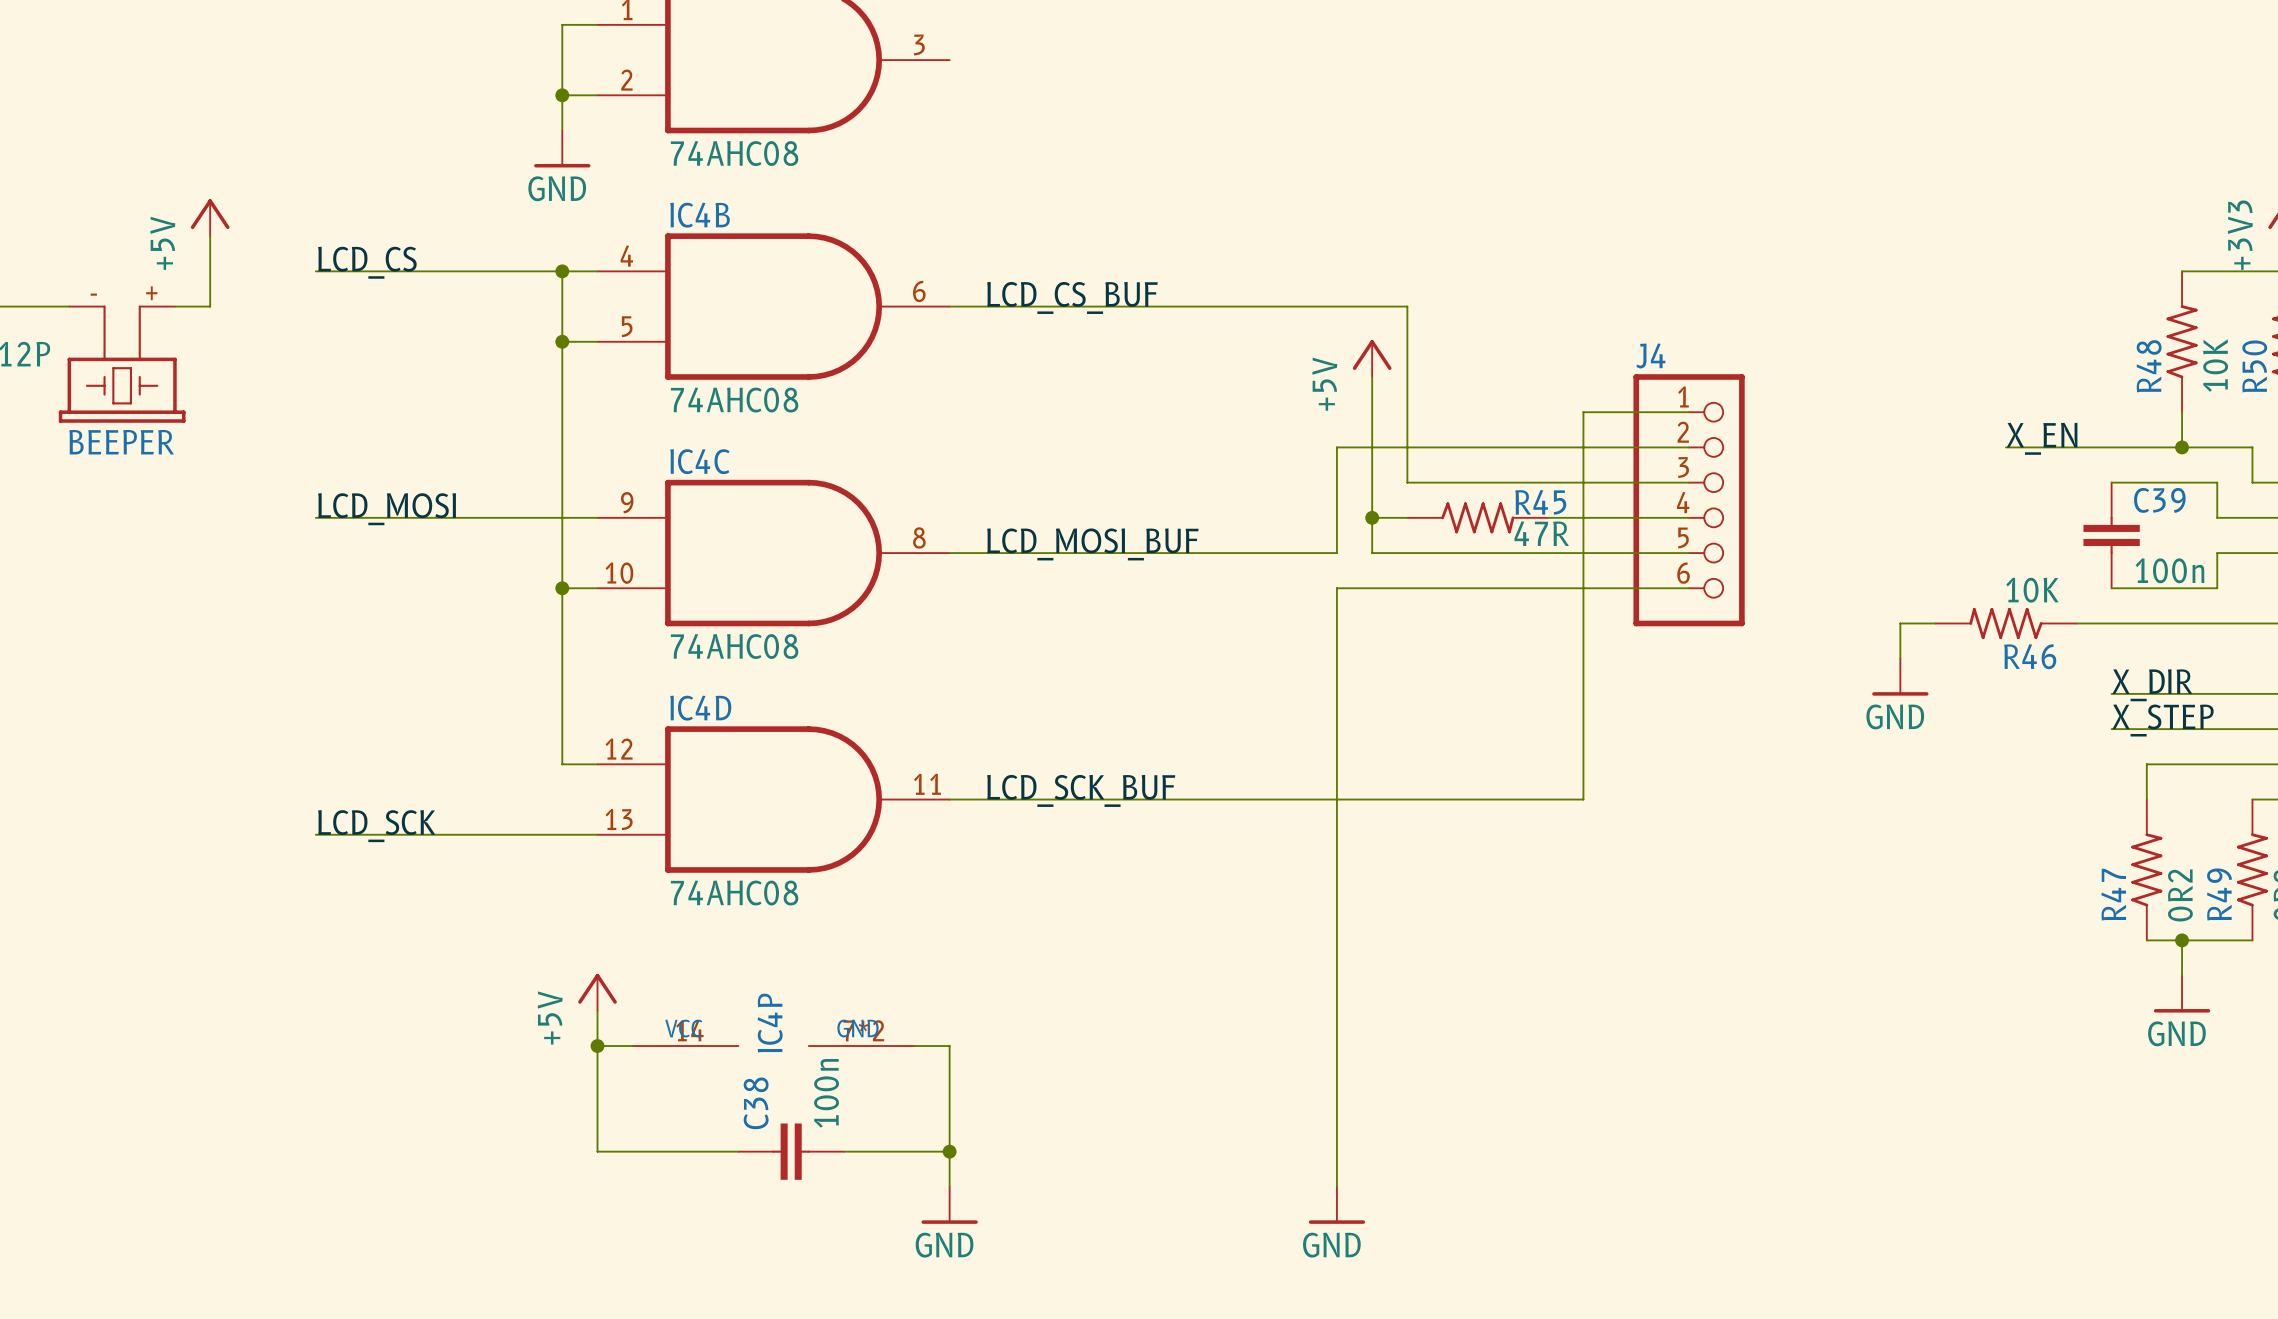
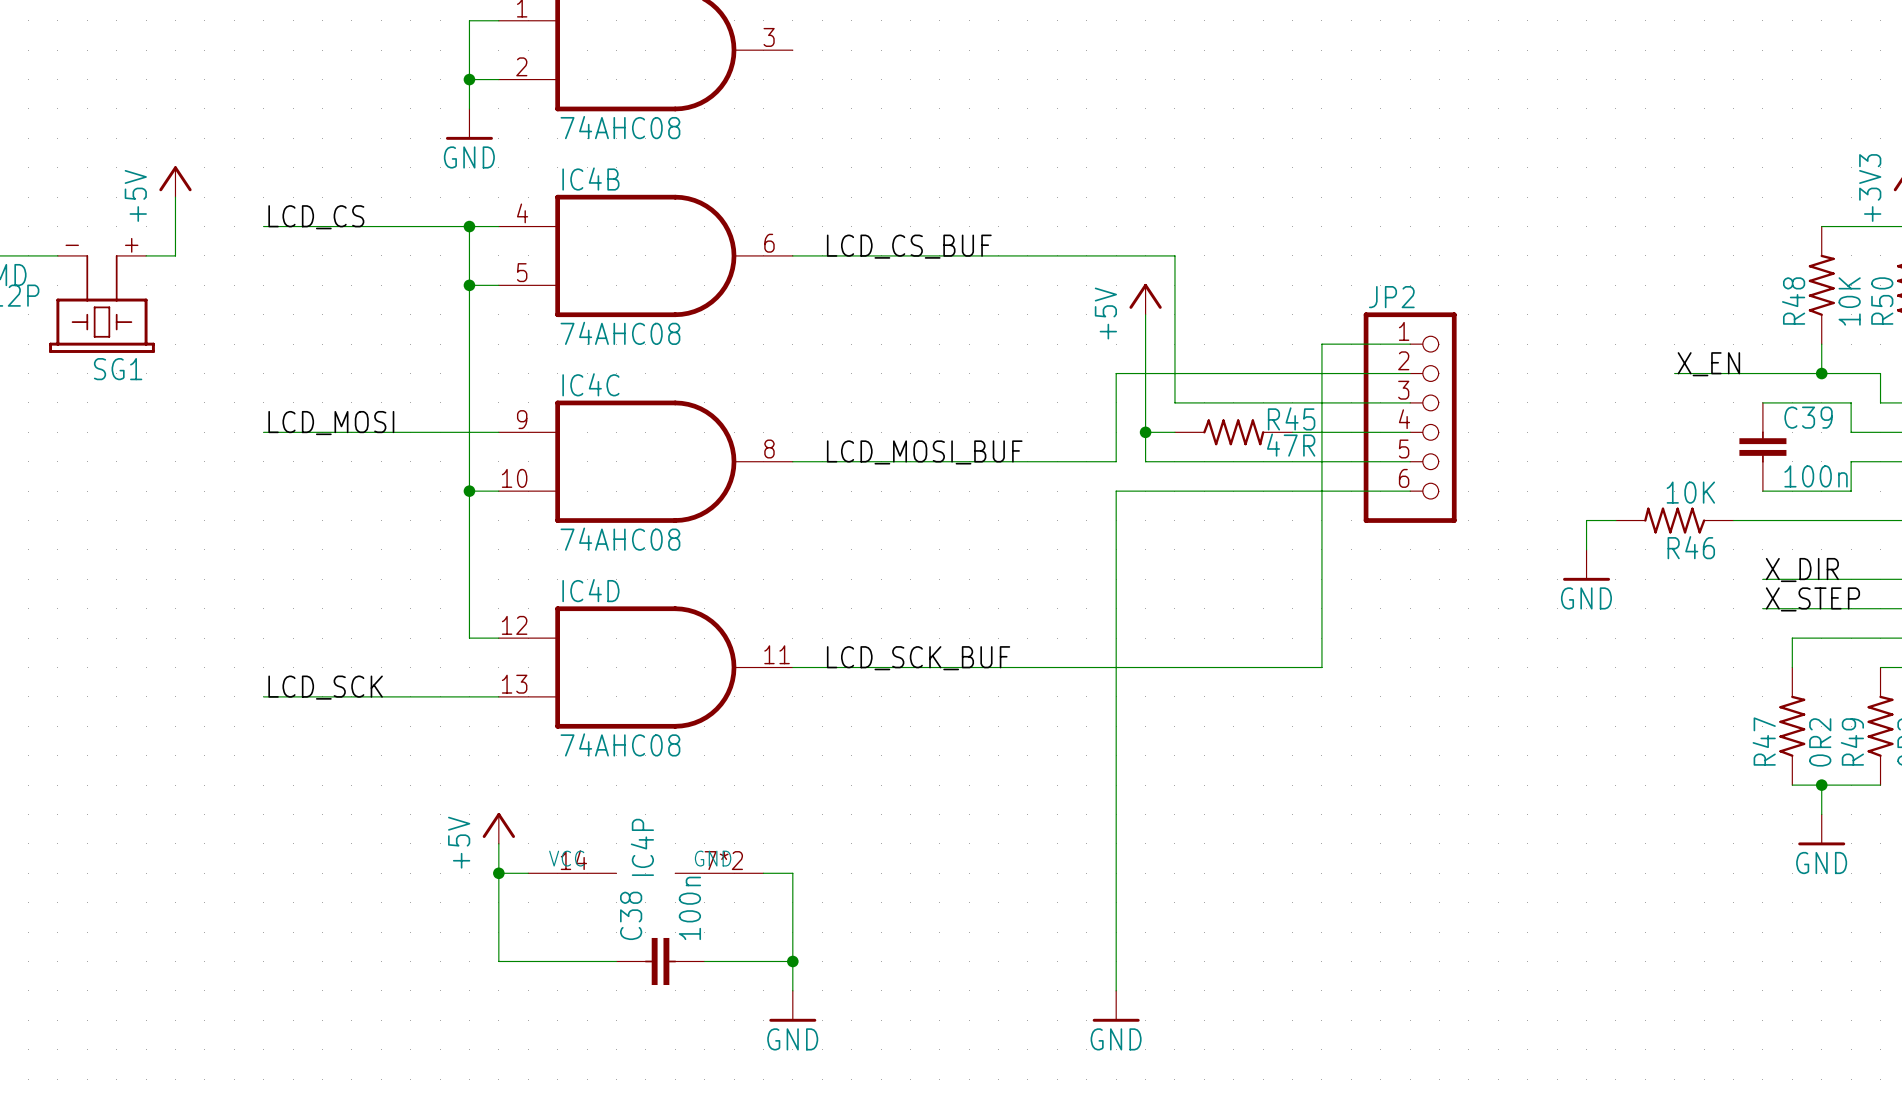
J4 name: J4 (1650, 356) -> JP2 (1391, 297)
BEEPER name: BEEPER (121, 442) -> SG1 (118, 369)

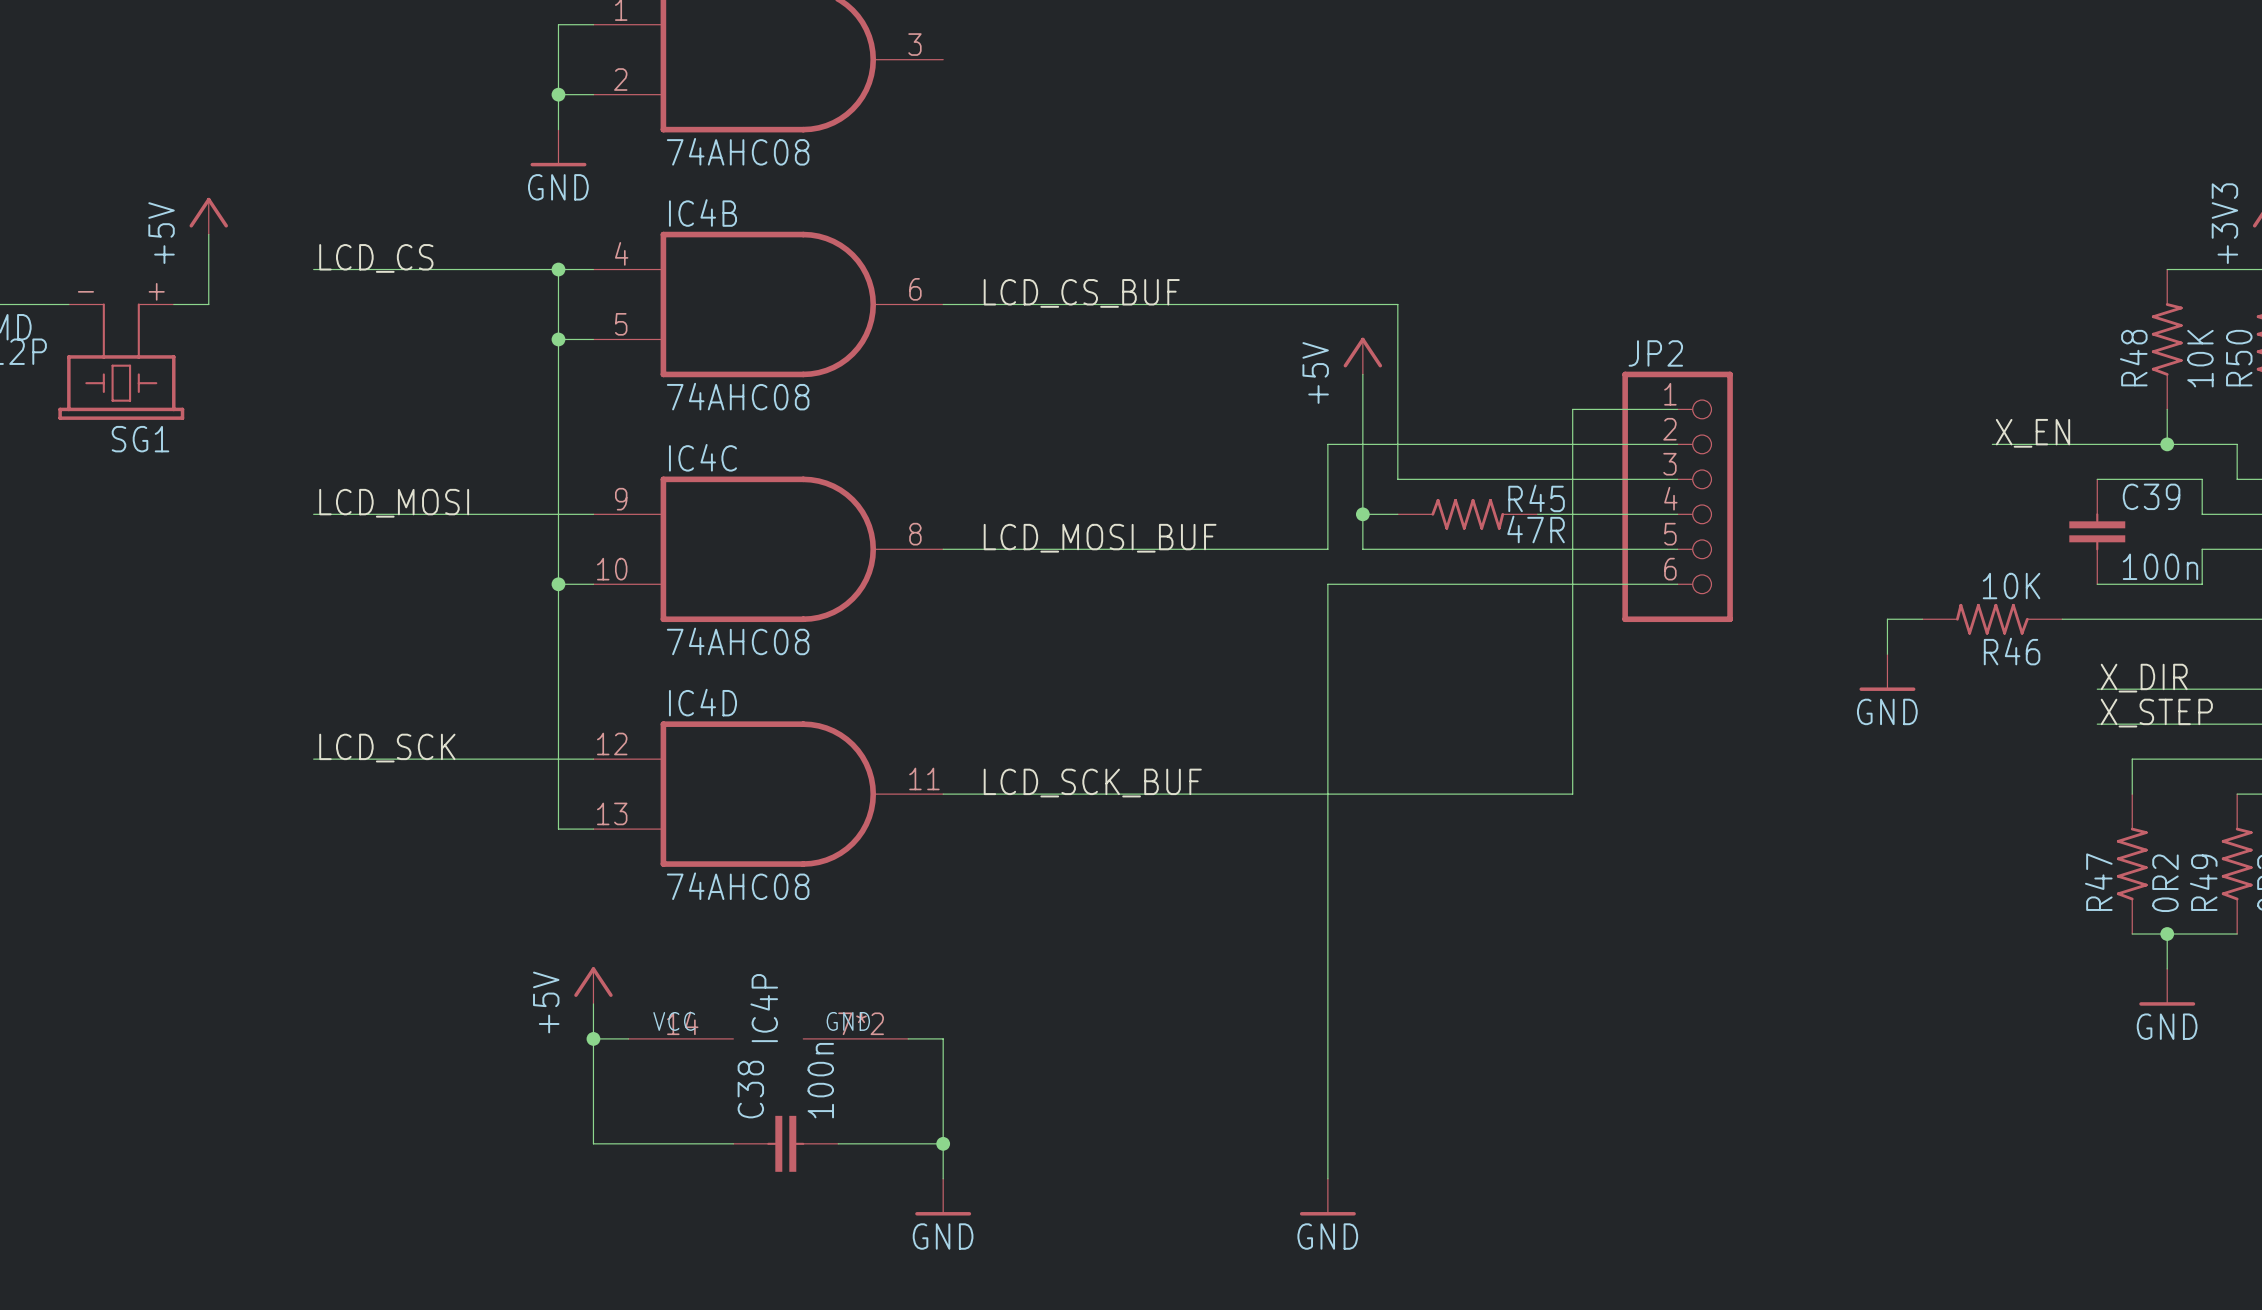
label position: LCD_SCK (325, 687) -> LCD_SCK (387, 748)
wire: (263, 696) (469, 696) -> (313, 759) (558, 759) (558, 829)

